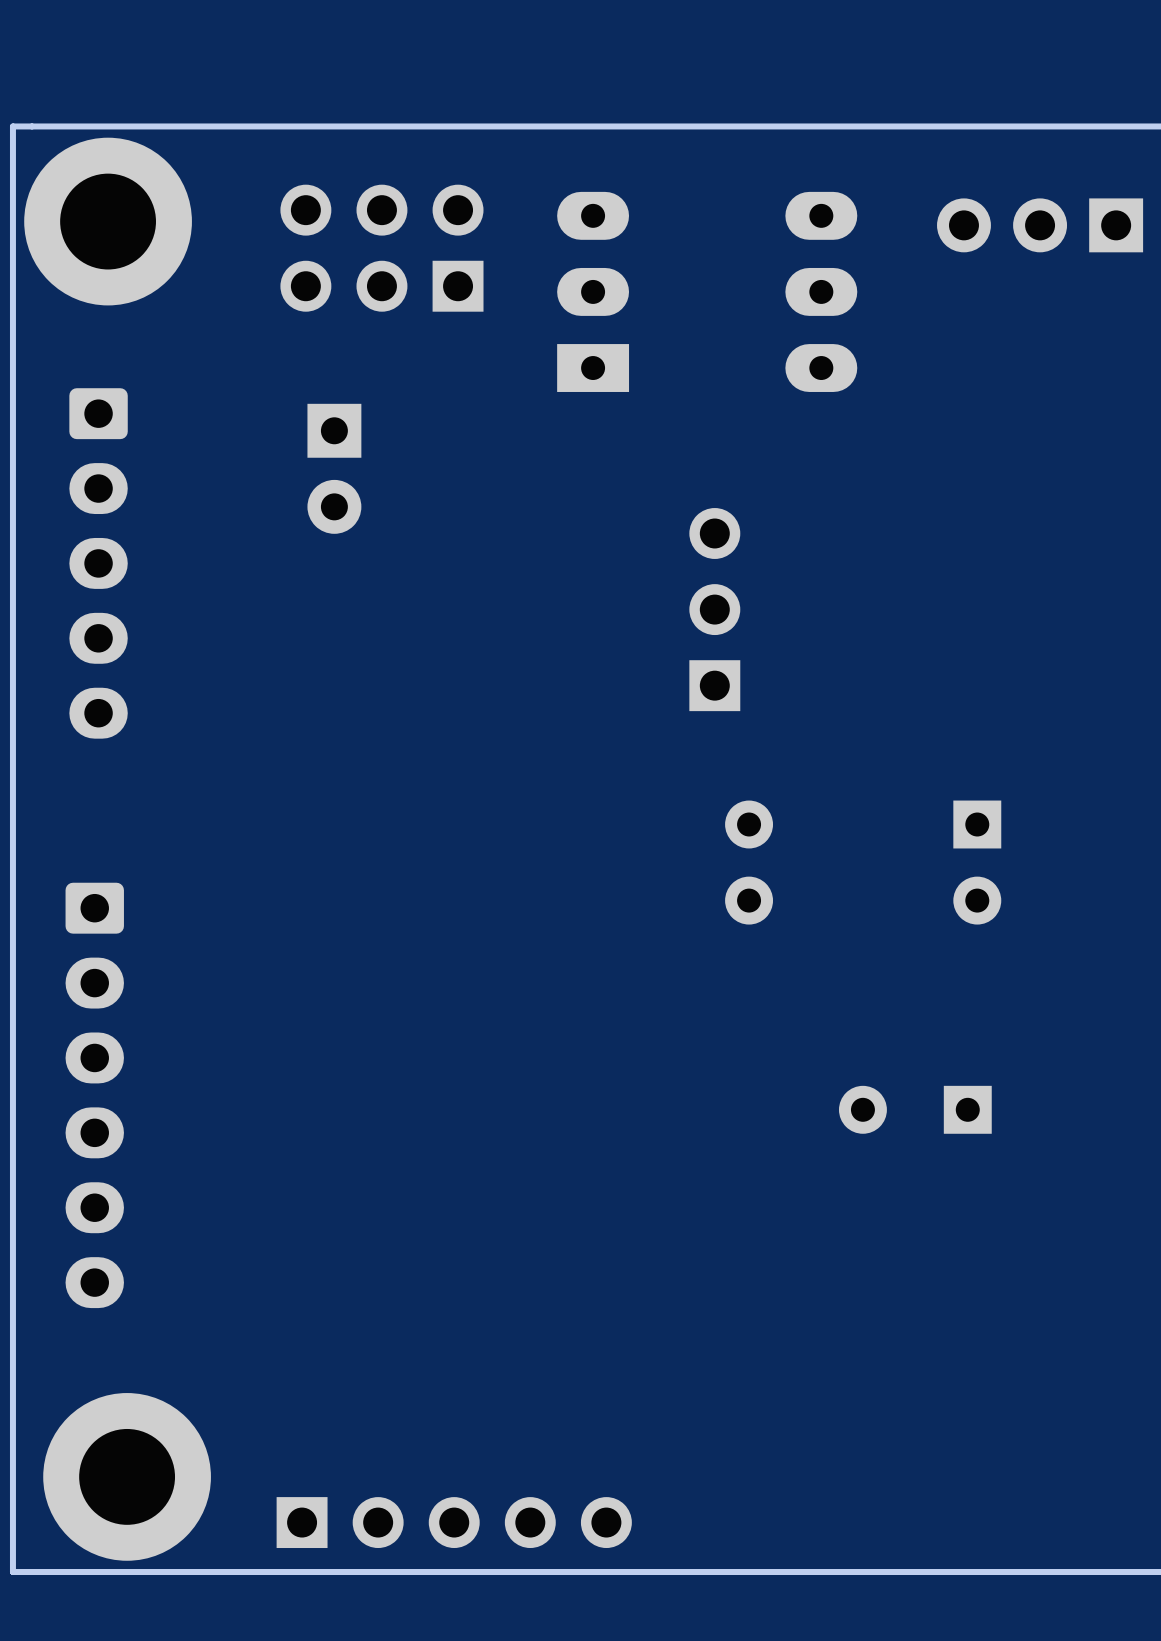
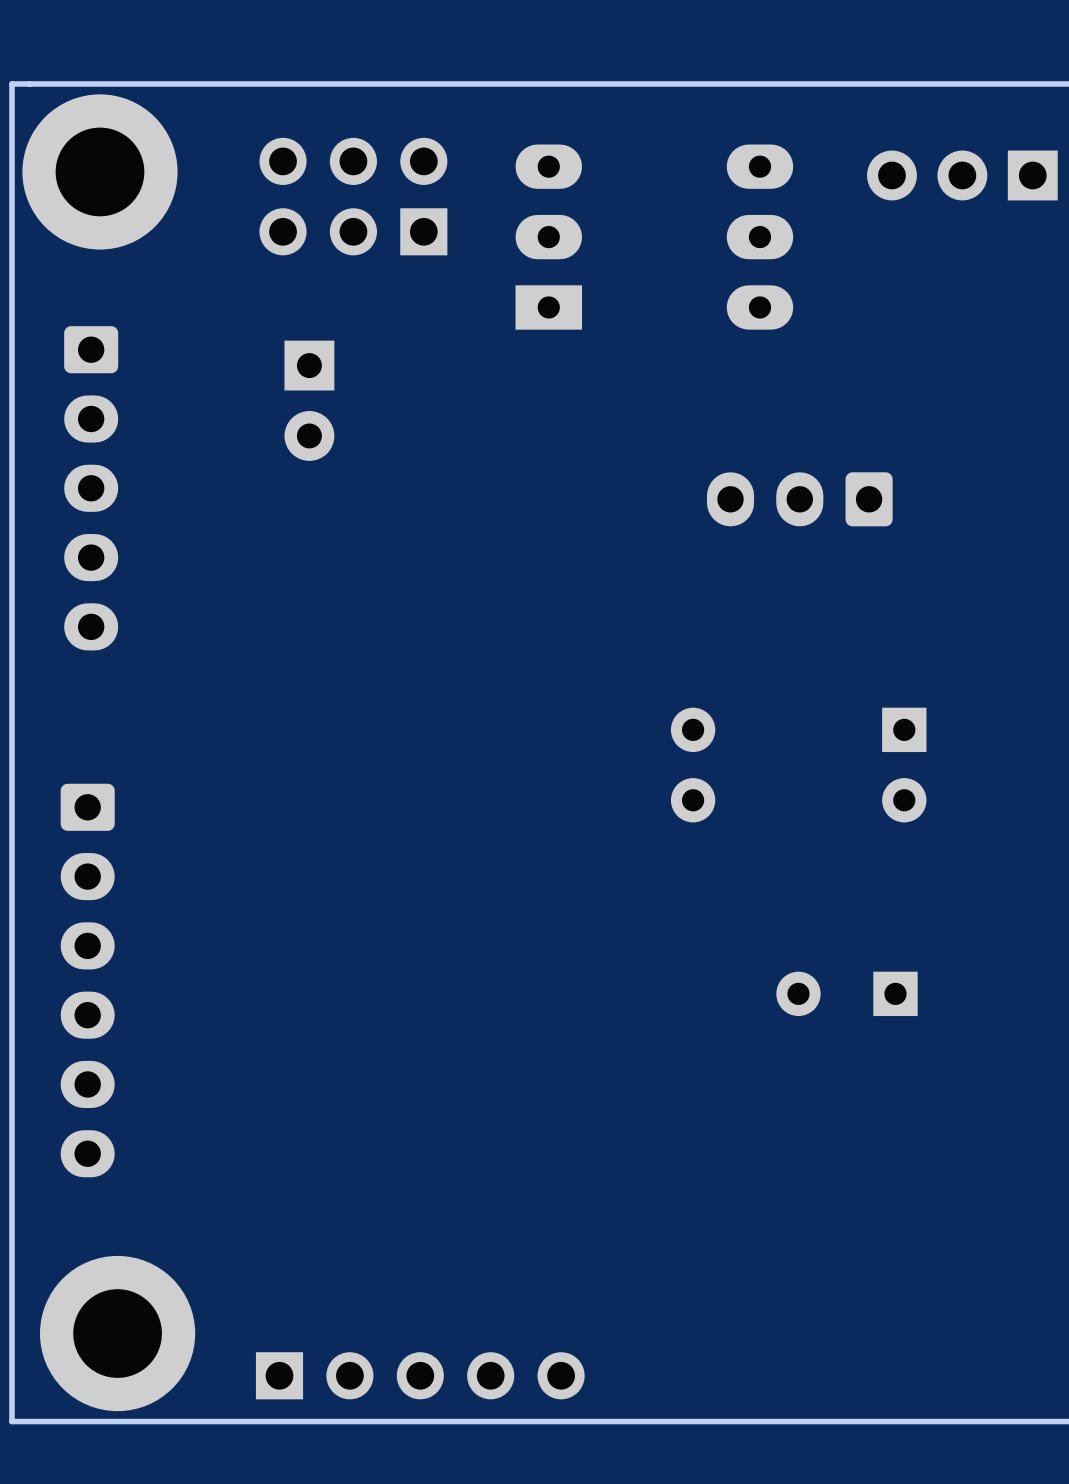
part: none -> (799, 499)
part: (714, 609) -> none

